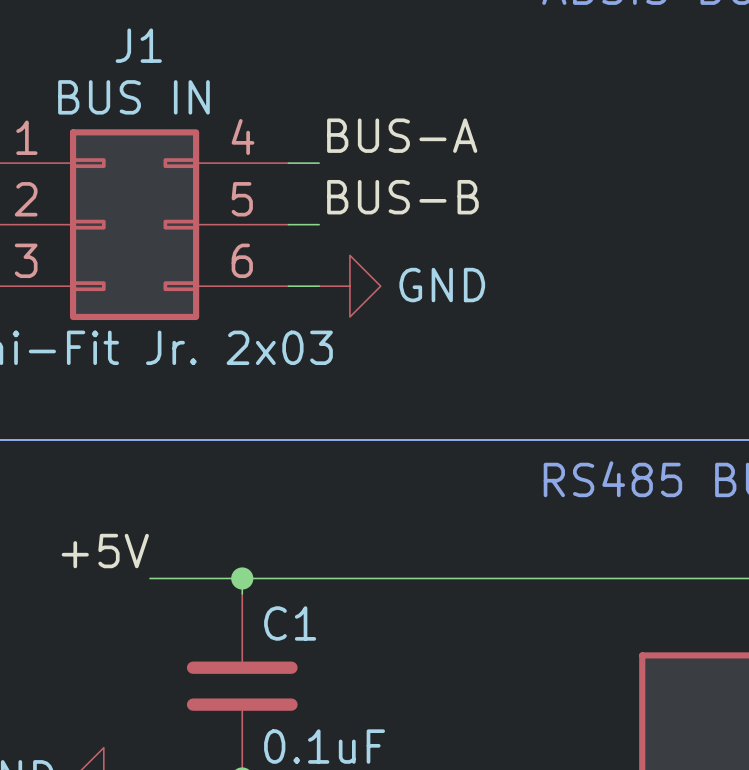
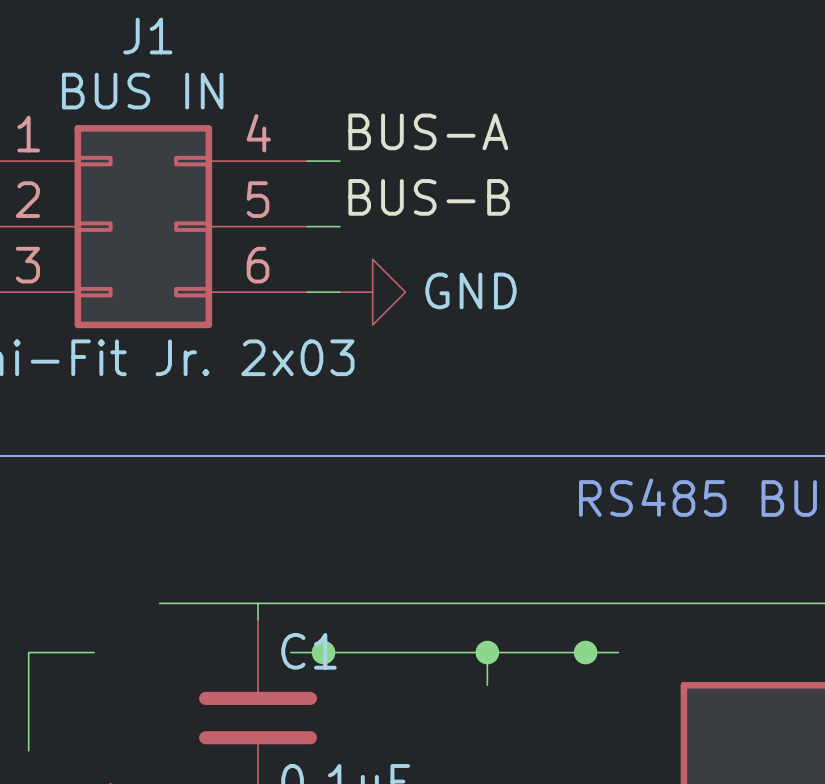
label: +5V (105, 551) -> none
junction position: (242, 578) -> (323, 652)
wire: none -> (94, 652) (28, 652) (28, 750)
wire: none -> (290, 652) (618, 652)
wire: none -> (487, 652) (487, 685)
junction: none -> (487, 652)
junction: none -> (585, 652)

